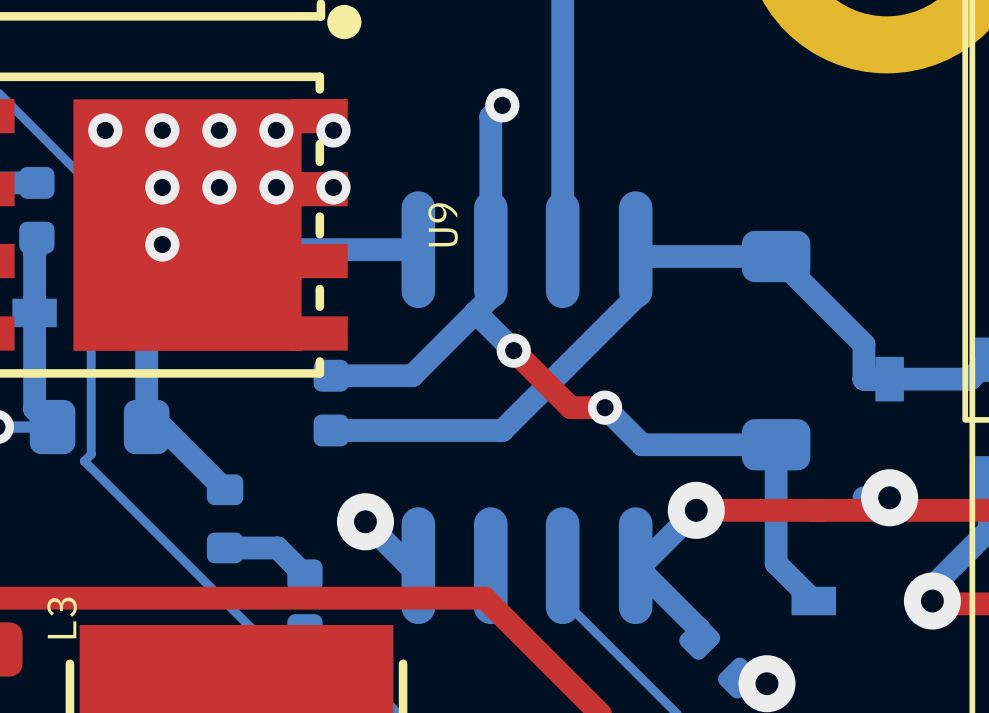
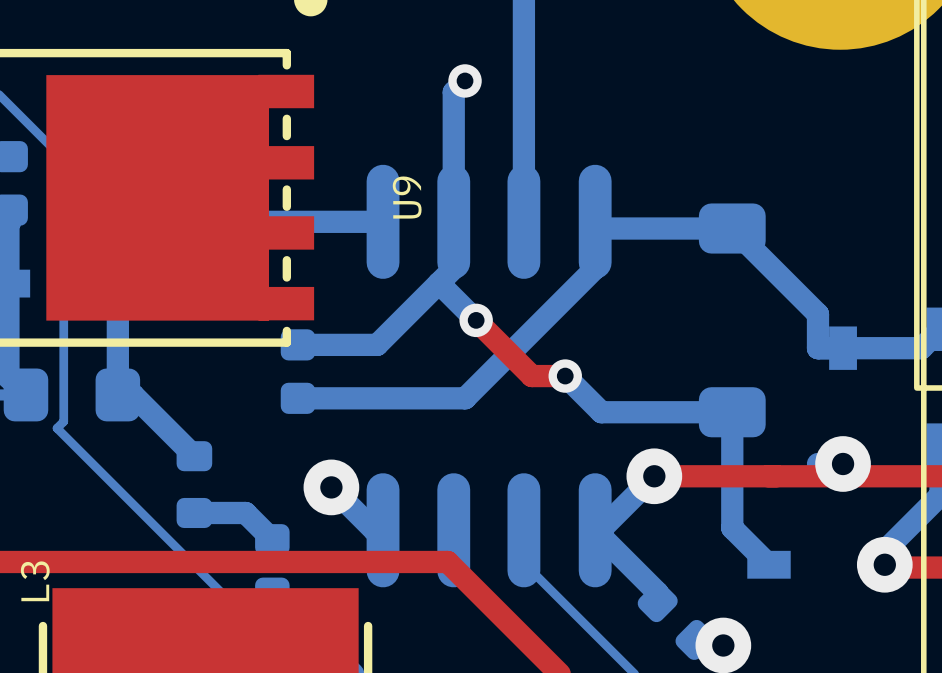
via: (105, 130) -> none
via: (162, 130) -> none
via: (219, 130) -> none
via: (276, 130) -> none
via: (333, 130) -> none
via: (162, 187) -> none
via: (219, 187) -> none
via: (276, 187) -> none
via: (333, 187) -> none
via: (162, 244) -> none

